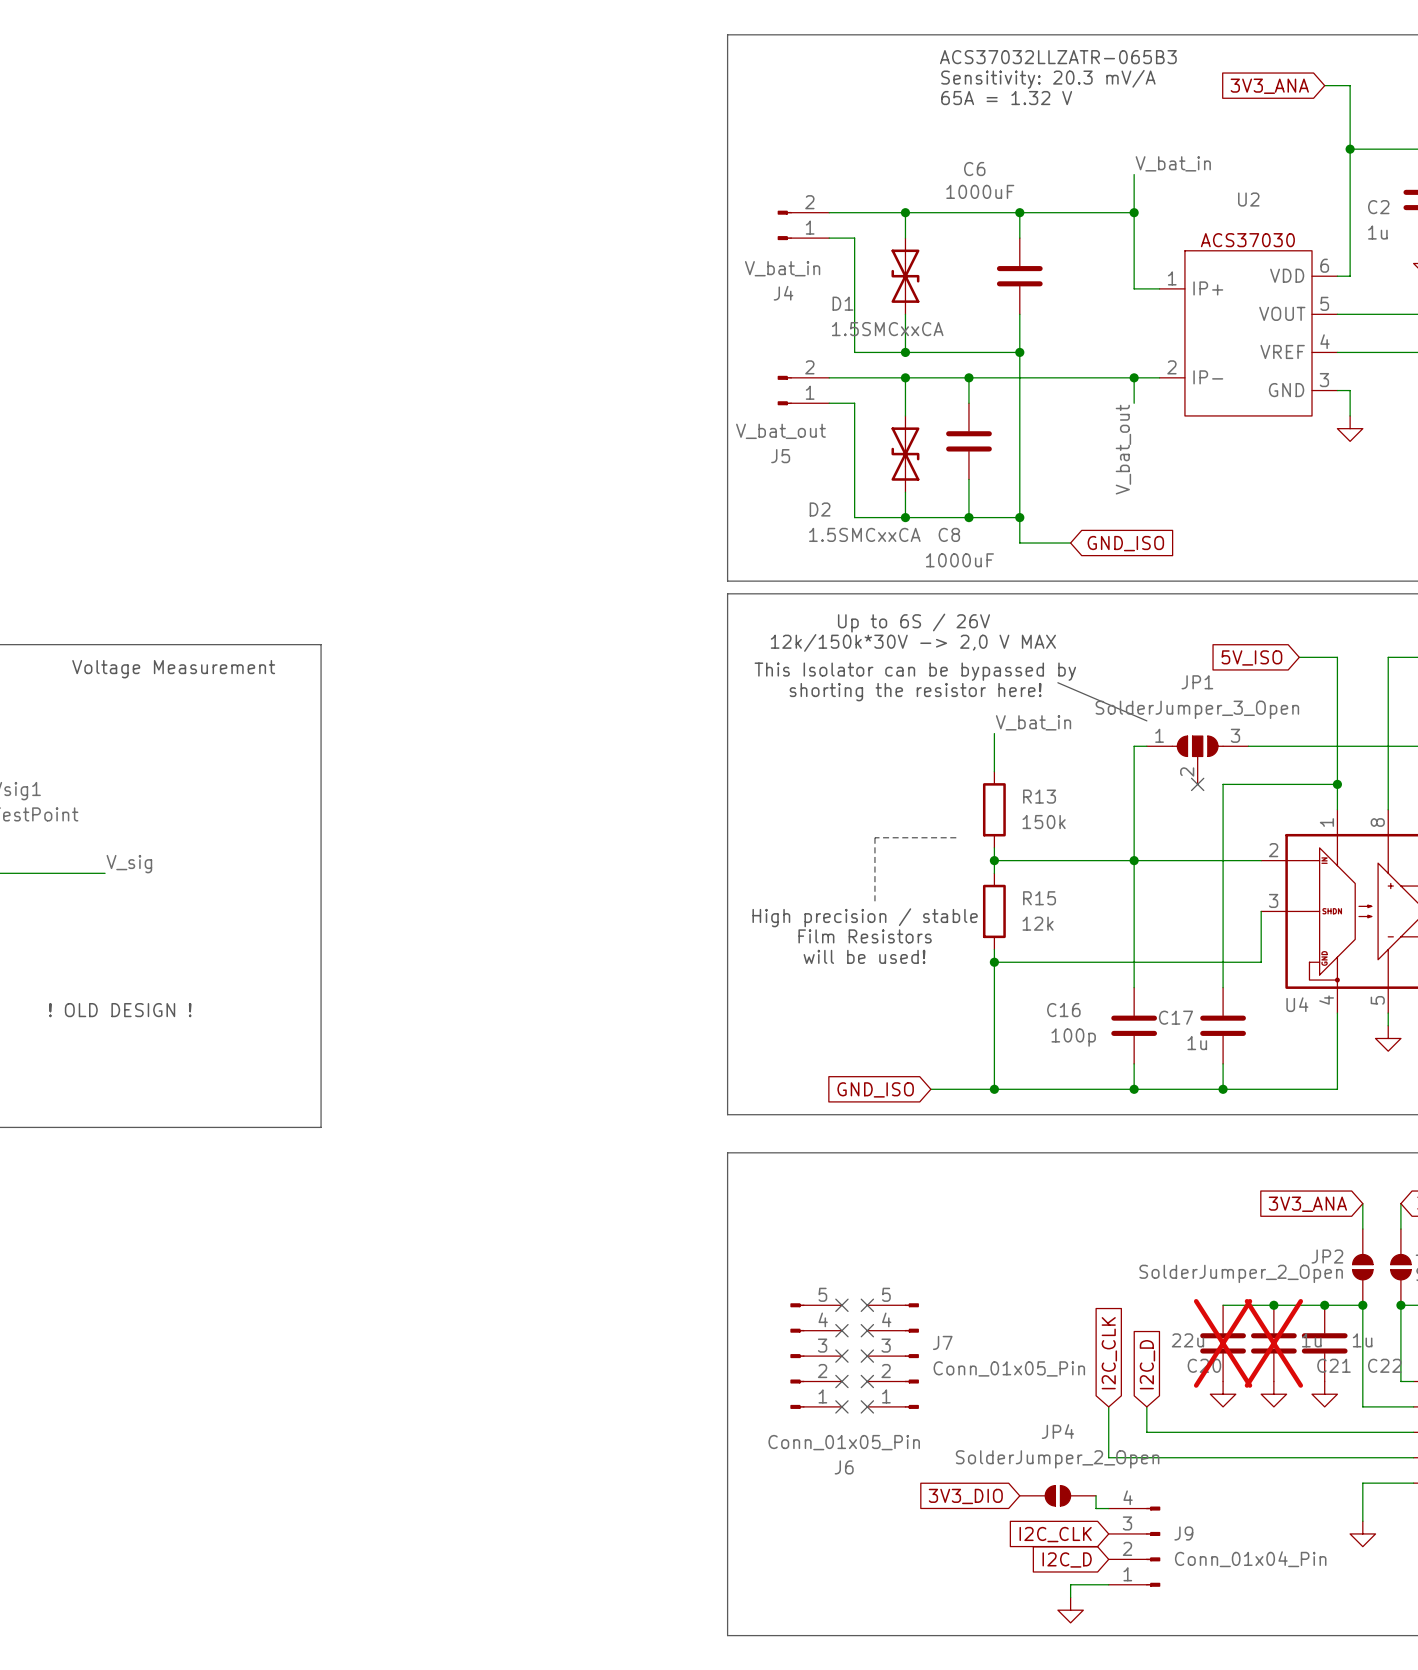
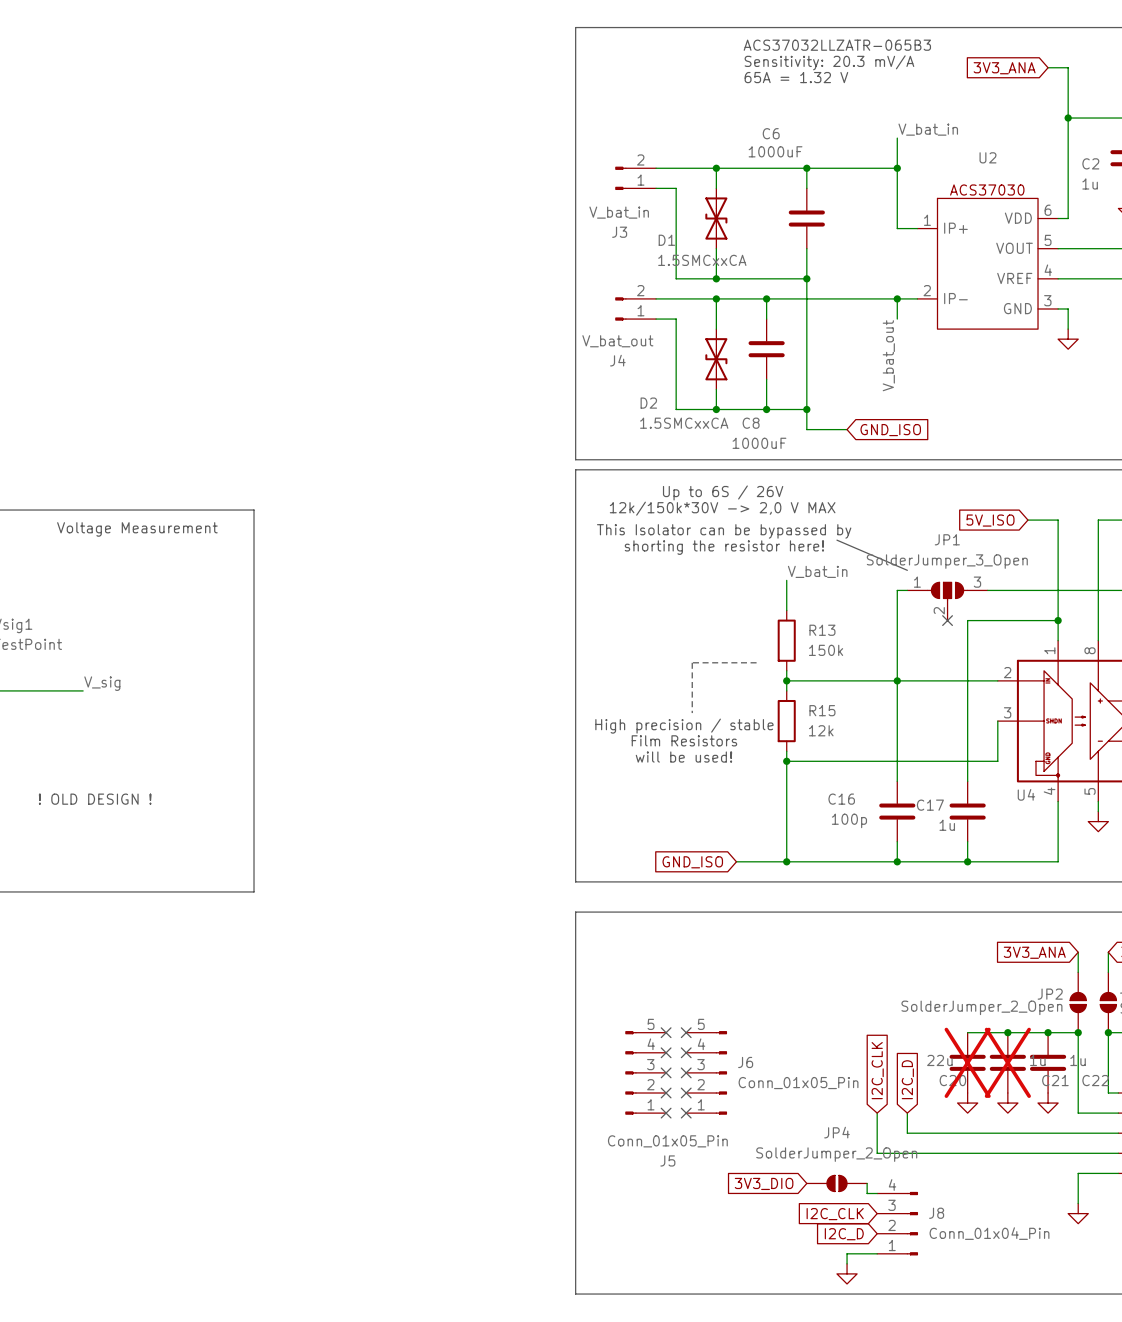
J4 name: J4 (783, 293) -> J3 (619, 232)
J5 name: J5 (780, 456) -> J4 (617, 360)
J7 name: J7 (942, 1342) -> J6 (745, 1062)
J6 name: J6 (844, 1467) -> J5 (667, 1160)
J9 name: J9 (1183, 1533) -> J8 (936, 1213)

